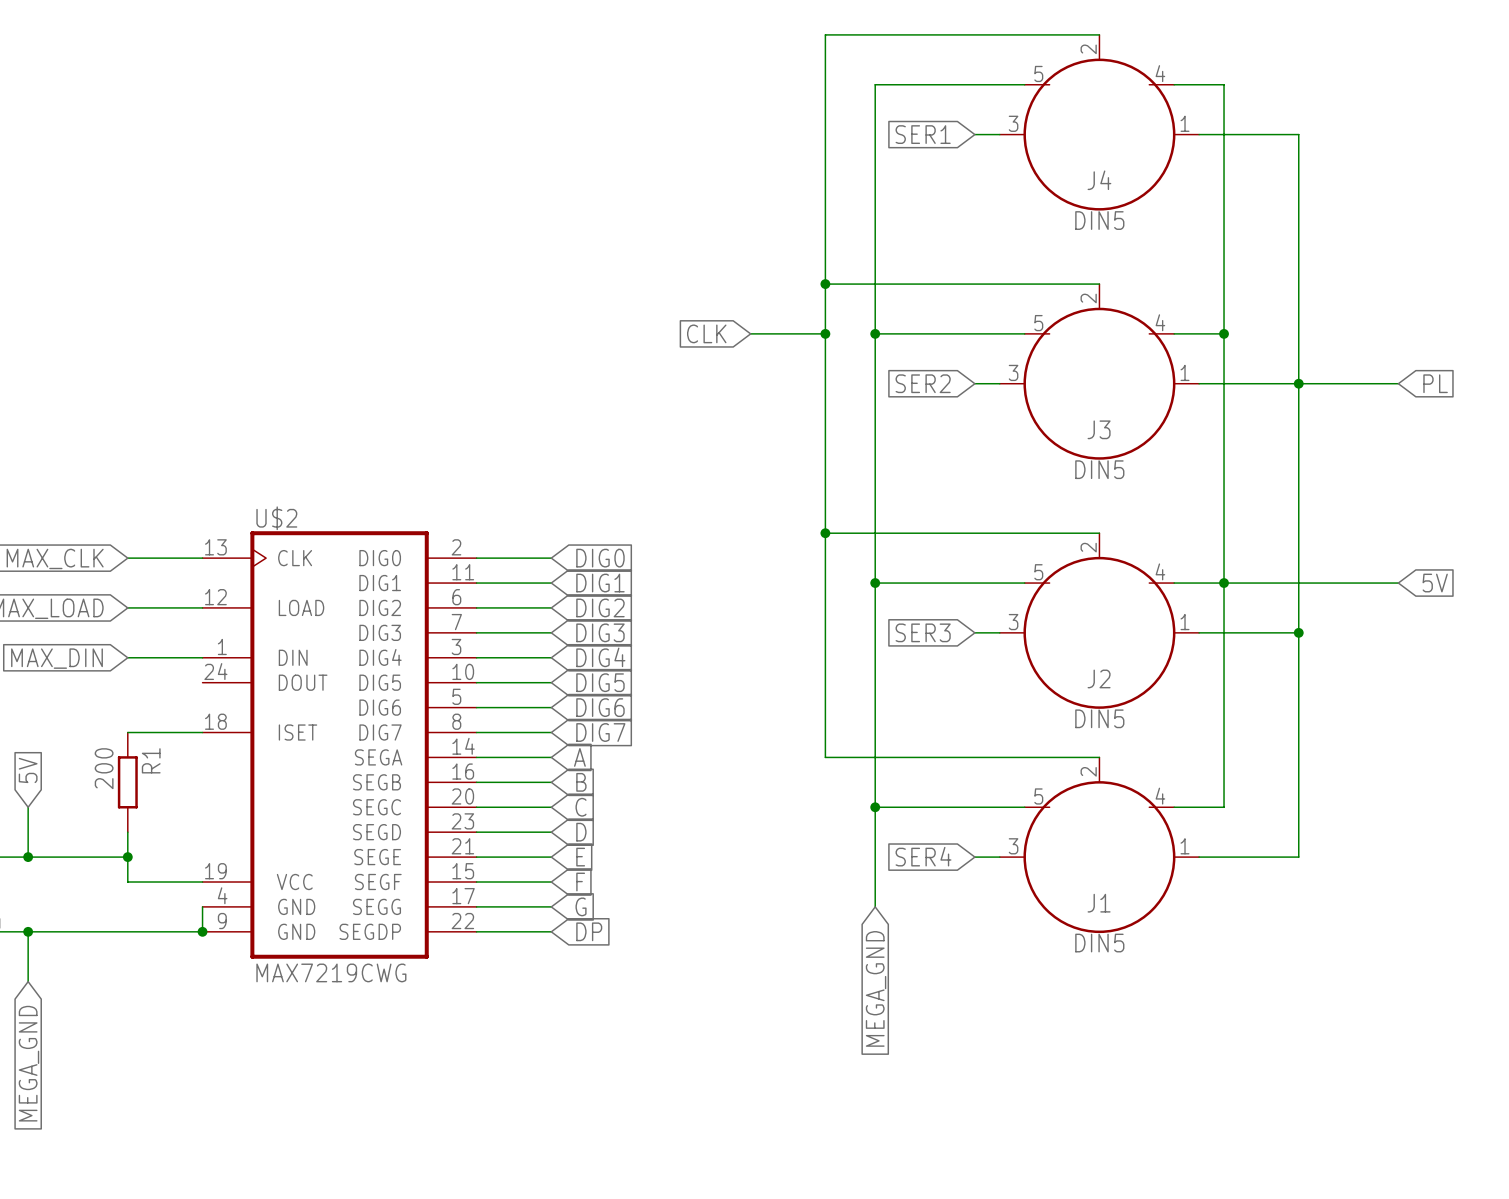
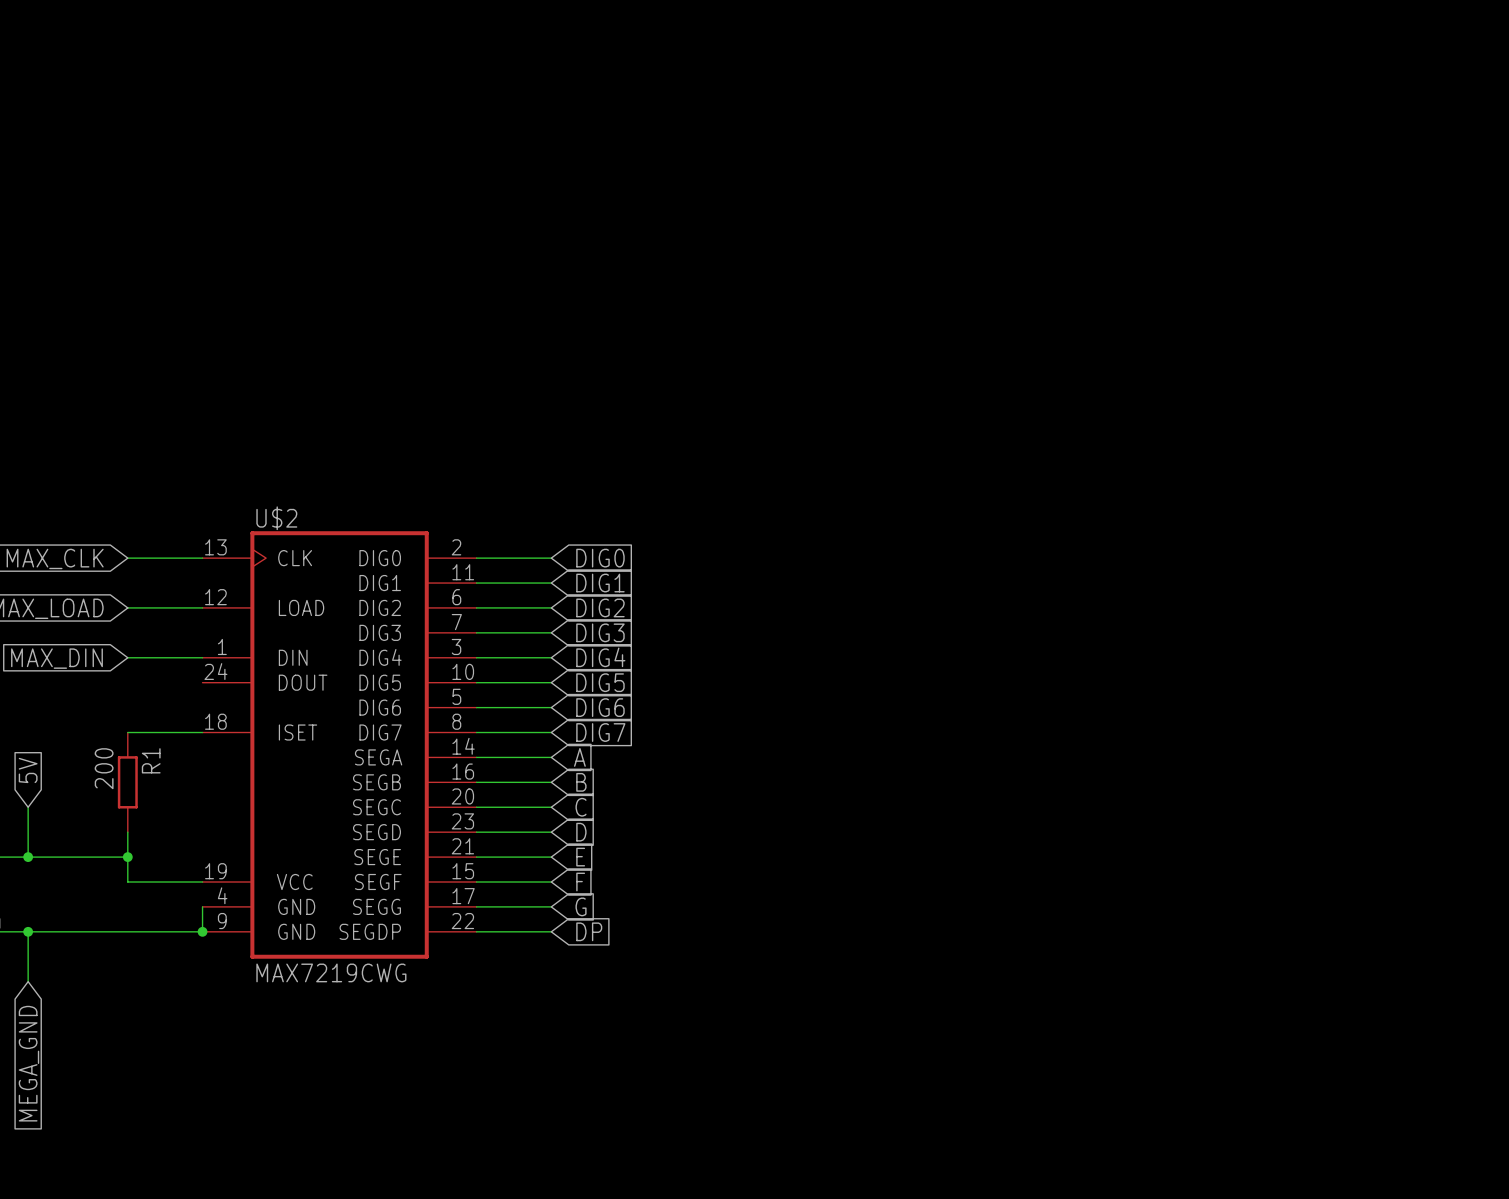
wire: (1099, 34) (825, 34) (825, 757) (1099, 757) -> none
wire: (1024, 84) (875, 84) (875, 906) -> none
wire: (1174, 84) (1224, 84) (1224, 807) (1174, 807) -> none
J4: DIN5 (1099, 122) -> none
global label: SER1 (923, 134) -> none
wire: (974, 134) (999, 134) -> none
wire: (1199, 134) (1298, 134) (1298, 857) (1199, 857) -> none
wire: (825, 284) (1099, 284) -> none
junction: (825, 284) -> none
global label: CLK (706, 333) -> none
wire: (750, 333) (825, 333) -> none
junction: (825, 333) -> none
wire: (875, 333) (1024, 333) -> none
junction: (875, 333) -> none
wire: (1174, 333) (1224, 333) -> none
junction: (1224, 333) -> none
J3: DIN5 (1099, 371) -> none
global label: SER2 (923, 383) -> none
wire: (974, 383) (999, 383) -> none
wire: (1199, 383) (1398, 383) -> none
junction: (1298, 383) -> none
global label: PL (1435, 383) -> none
wire: (825, 533) (1099, 533) -> none
junction: (825, 533) -> none
wire: (875, 583) (1024, 583) -> none
junction: (875, 583) -> none
wire: (1174, 583) (1398, 583) -> none
junction: (1224, 583) -> none
global label: 5V (1435, 583) -> none
J2: DIN5 (1099, 621) -> none
global label: SER3 (923, 632) -> none
wire: (974, 632) (999, 632) -> none
wire: (1199, 632) (1298, 632) -> none
junction: (1298, 632) -> none
wire: (875, 807) (1024, 807) -> none
junction: (875, 807) -> none
J1: DIN5 (1099, 845) -> none
global label: SER4 (923, 856) -> none
wire: (974, 857) (999, 857) -> none
global label: MEGA_GND (876, 988) -> none

